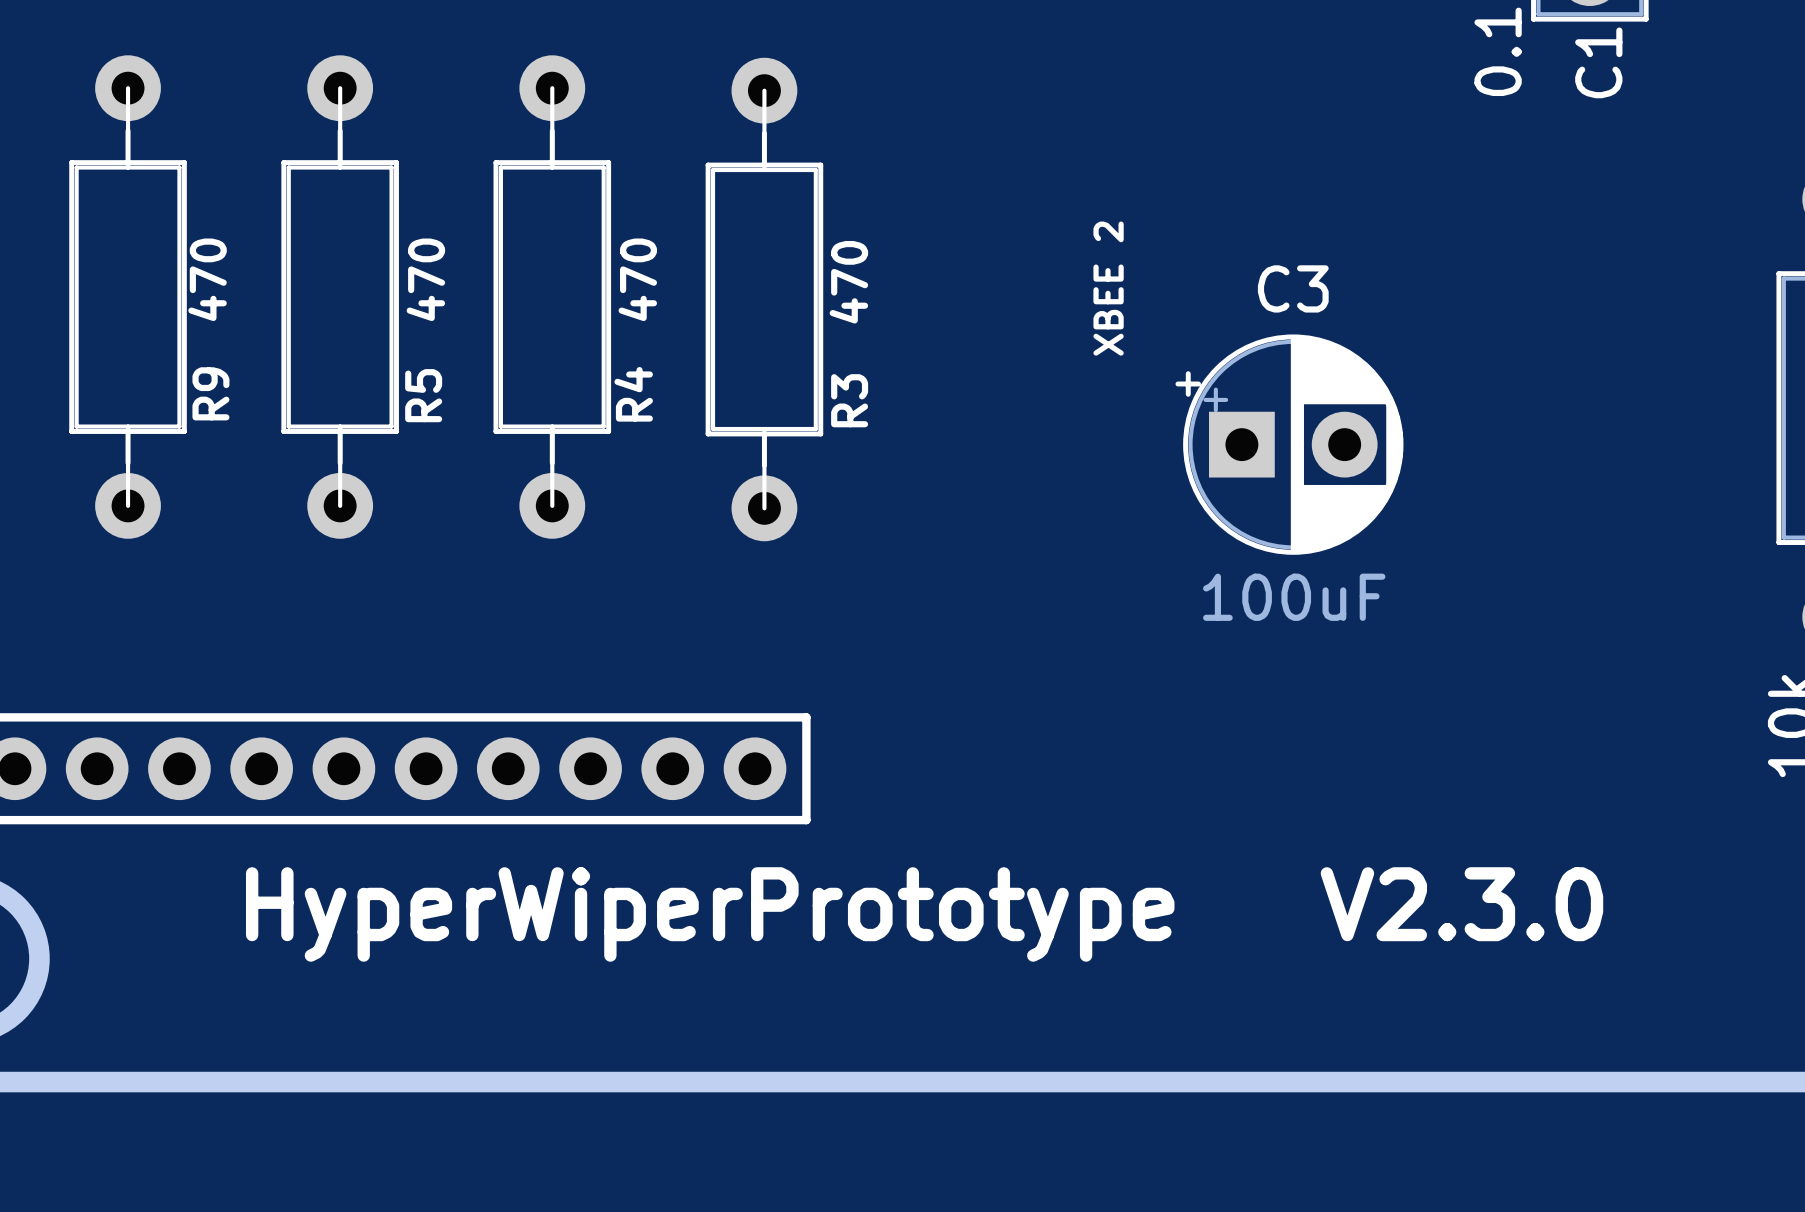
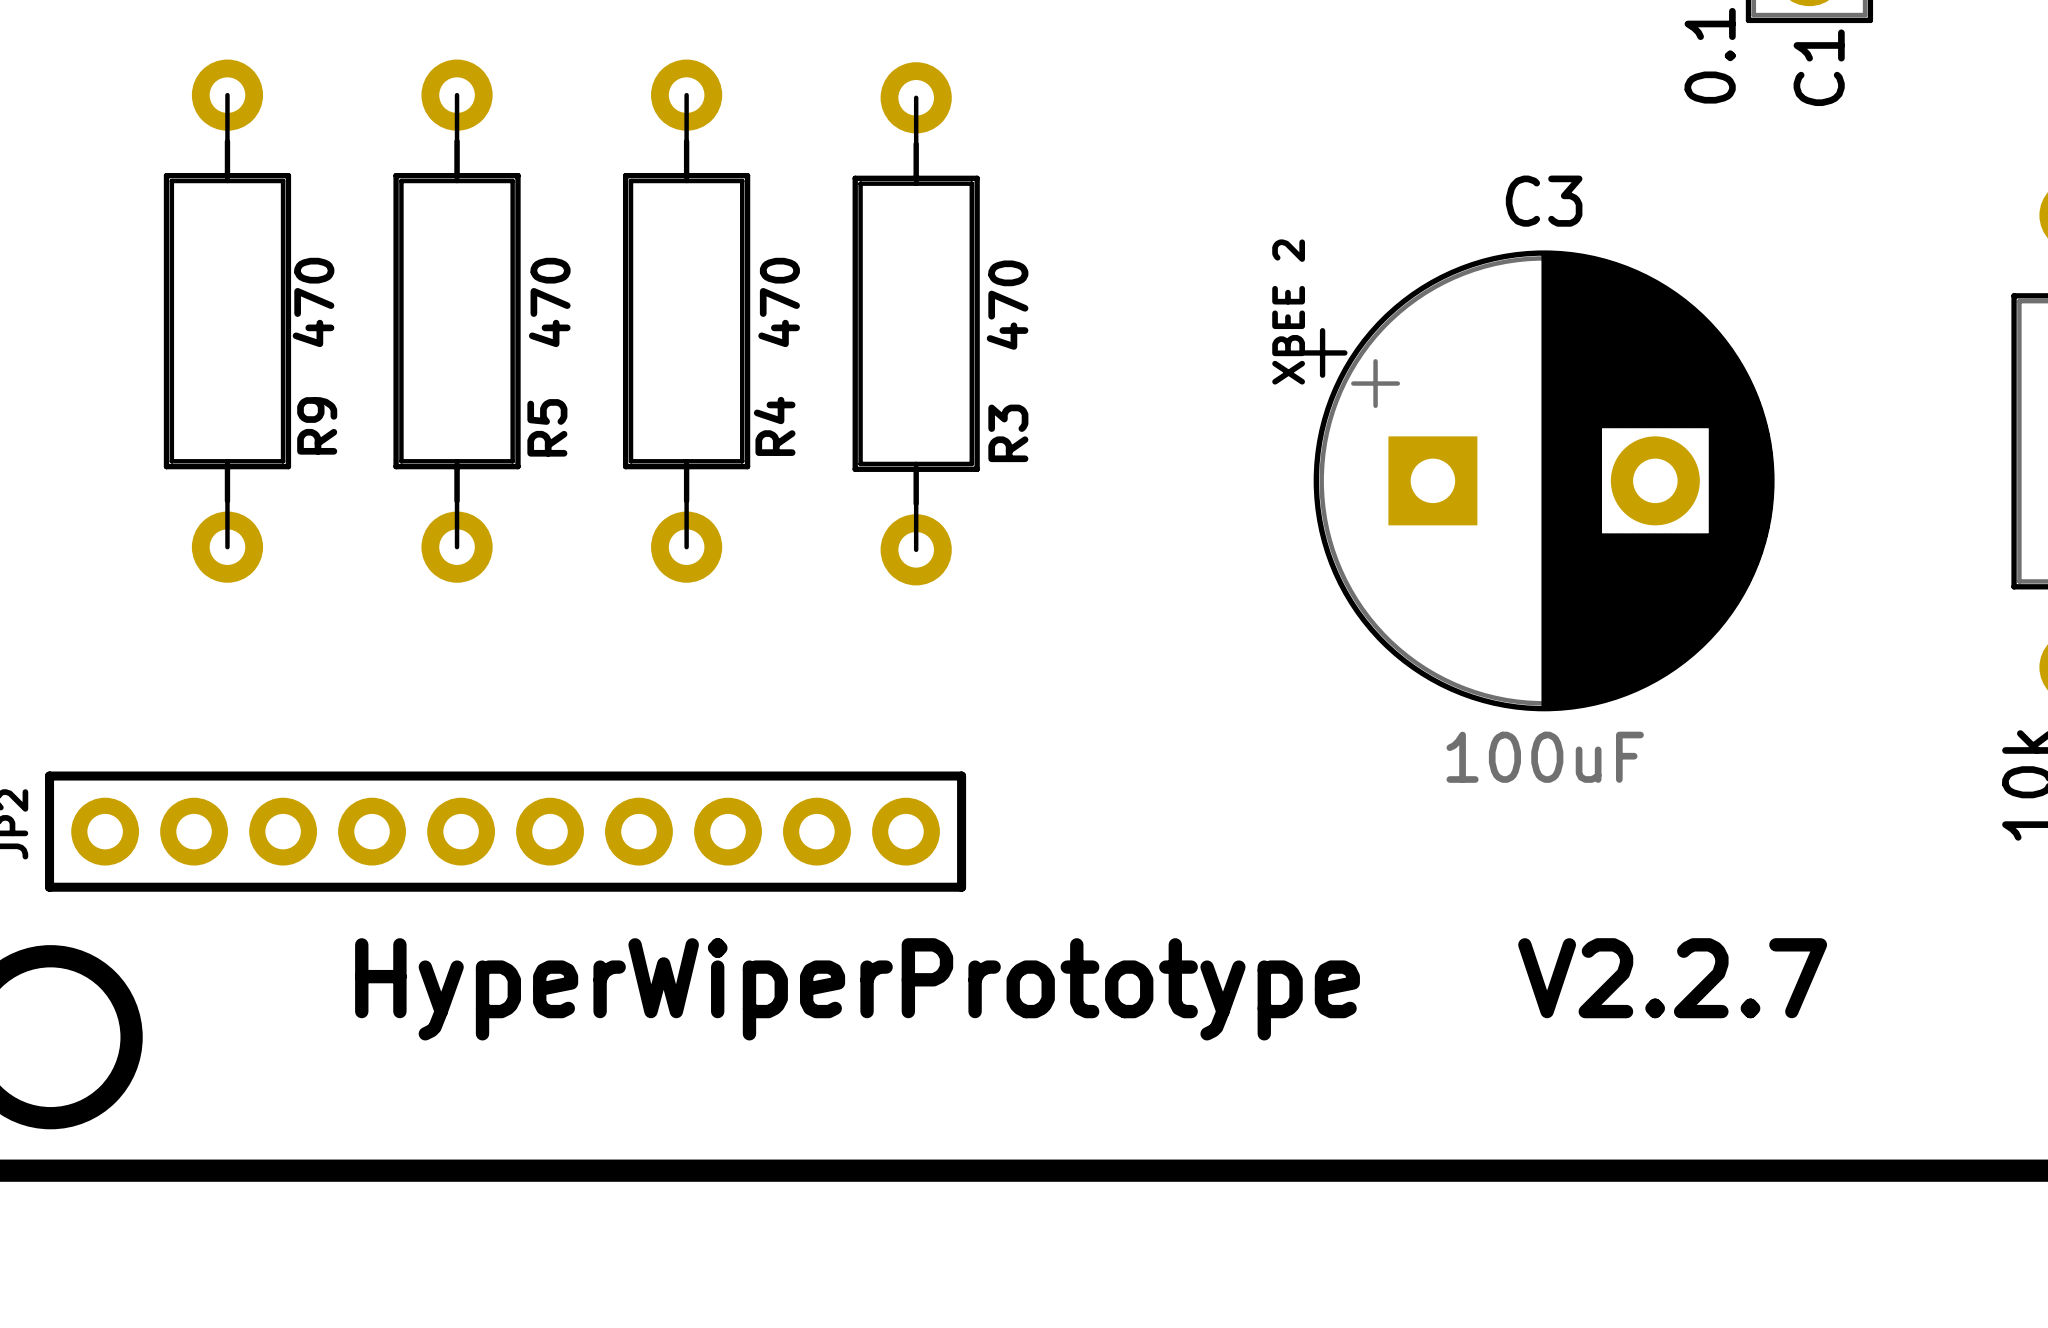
C3 name position: C3 (1293, 288) -> C3 (1544, 201)
C3 footprint: [1175, 334, 1404, 555] -> [1297, 250, 1775, 712]
C3 value position: 100uF (1294, 597) -> 100uF (1545, 757)
text: HyperWiperPrototype V2.3.0 (924, 914) -> HyperWiperPrototype V2.2.7 (1091, 989)

